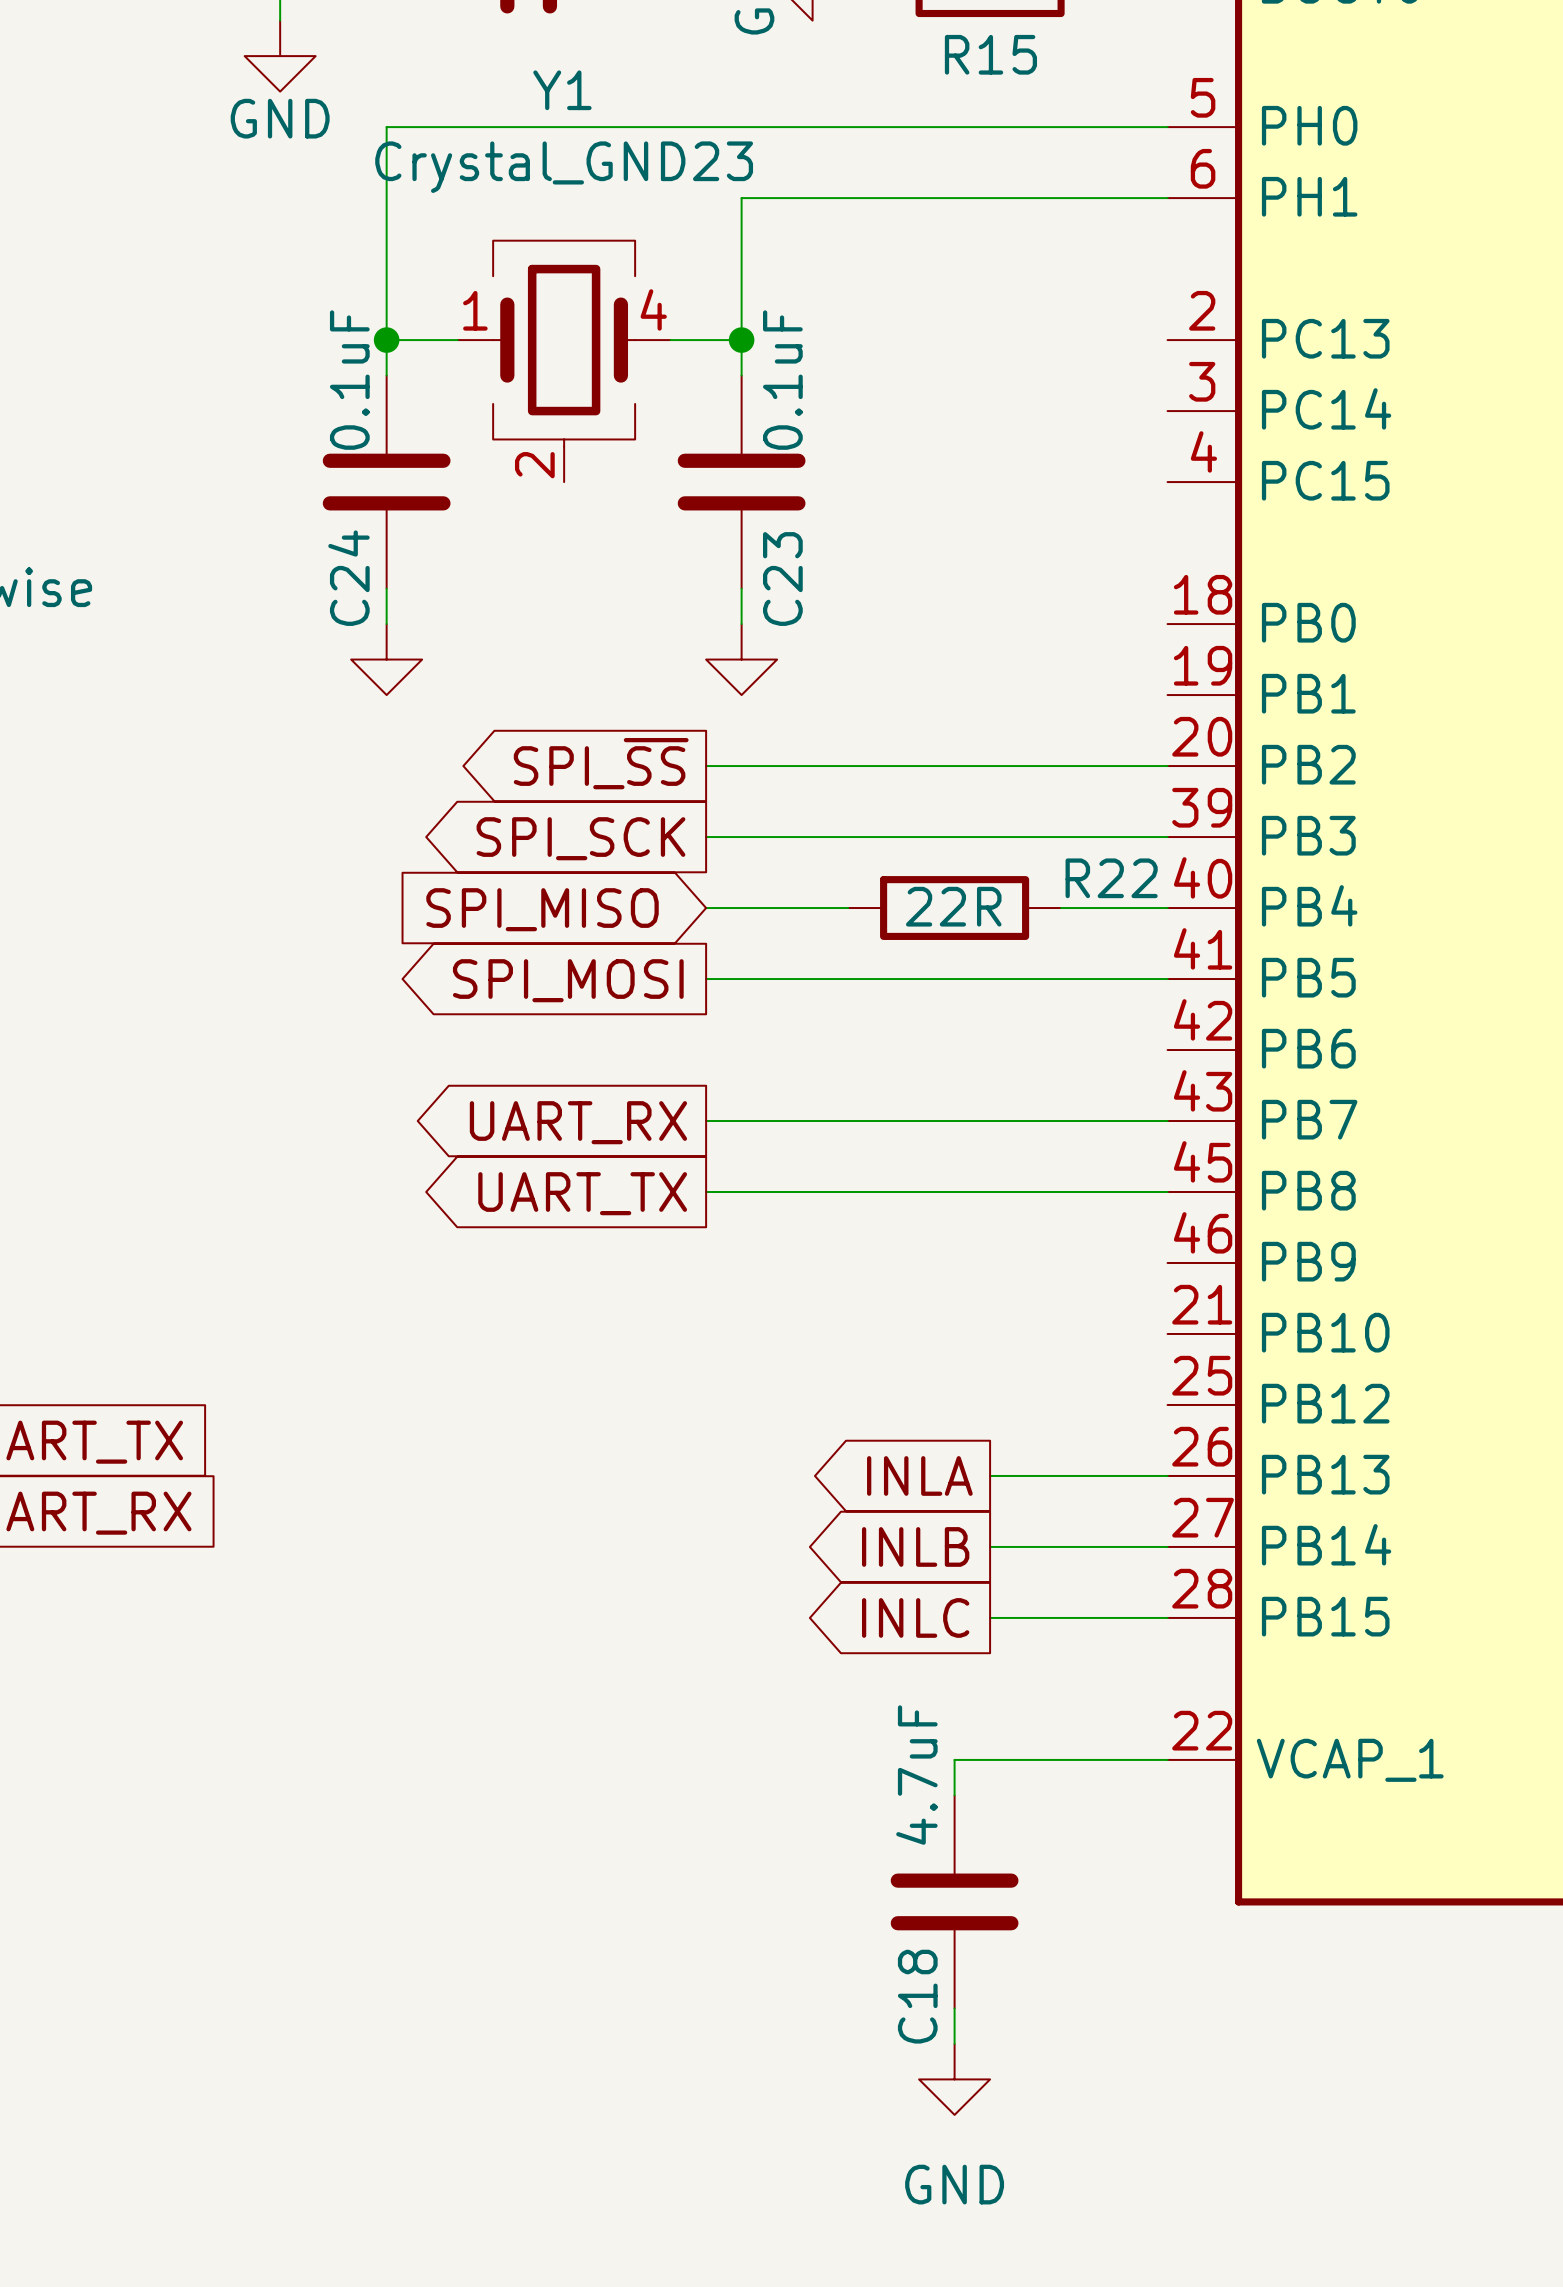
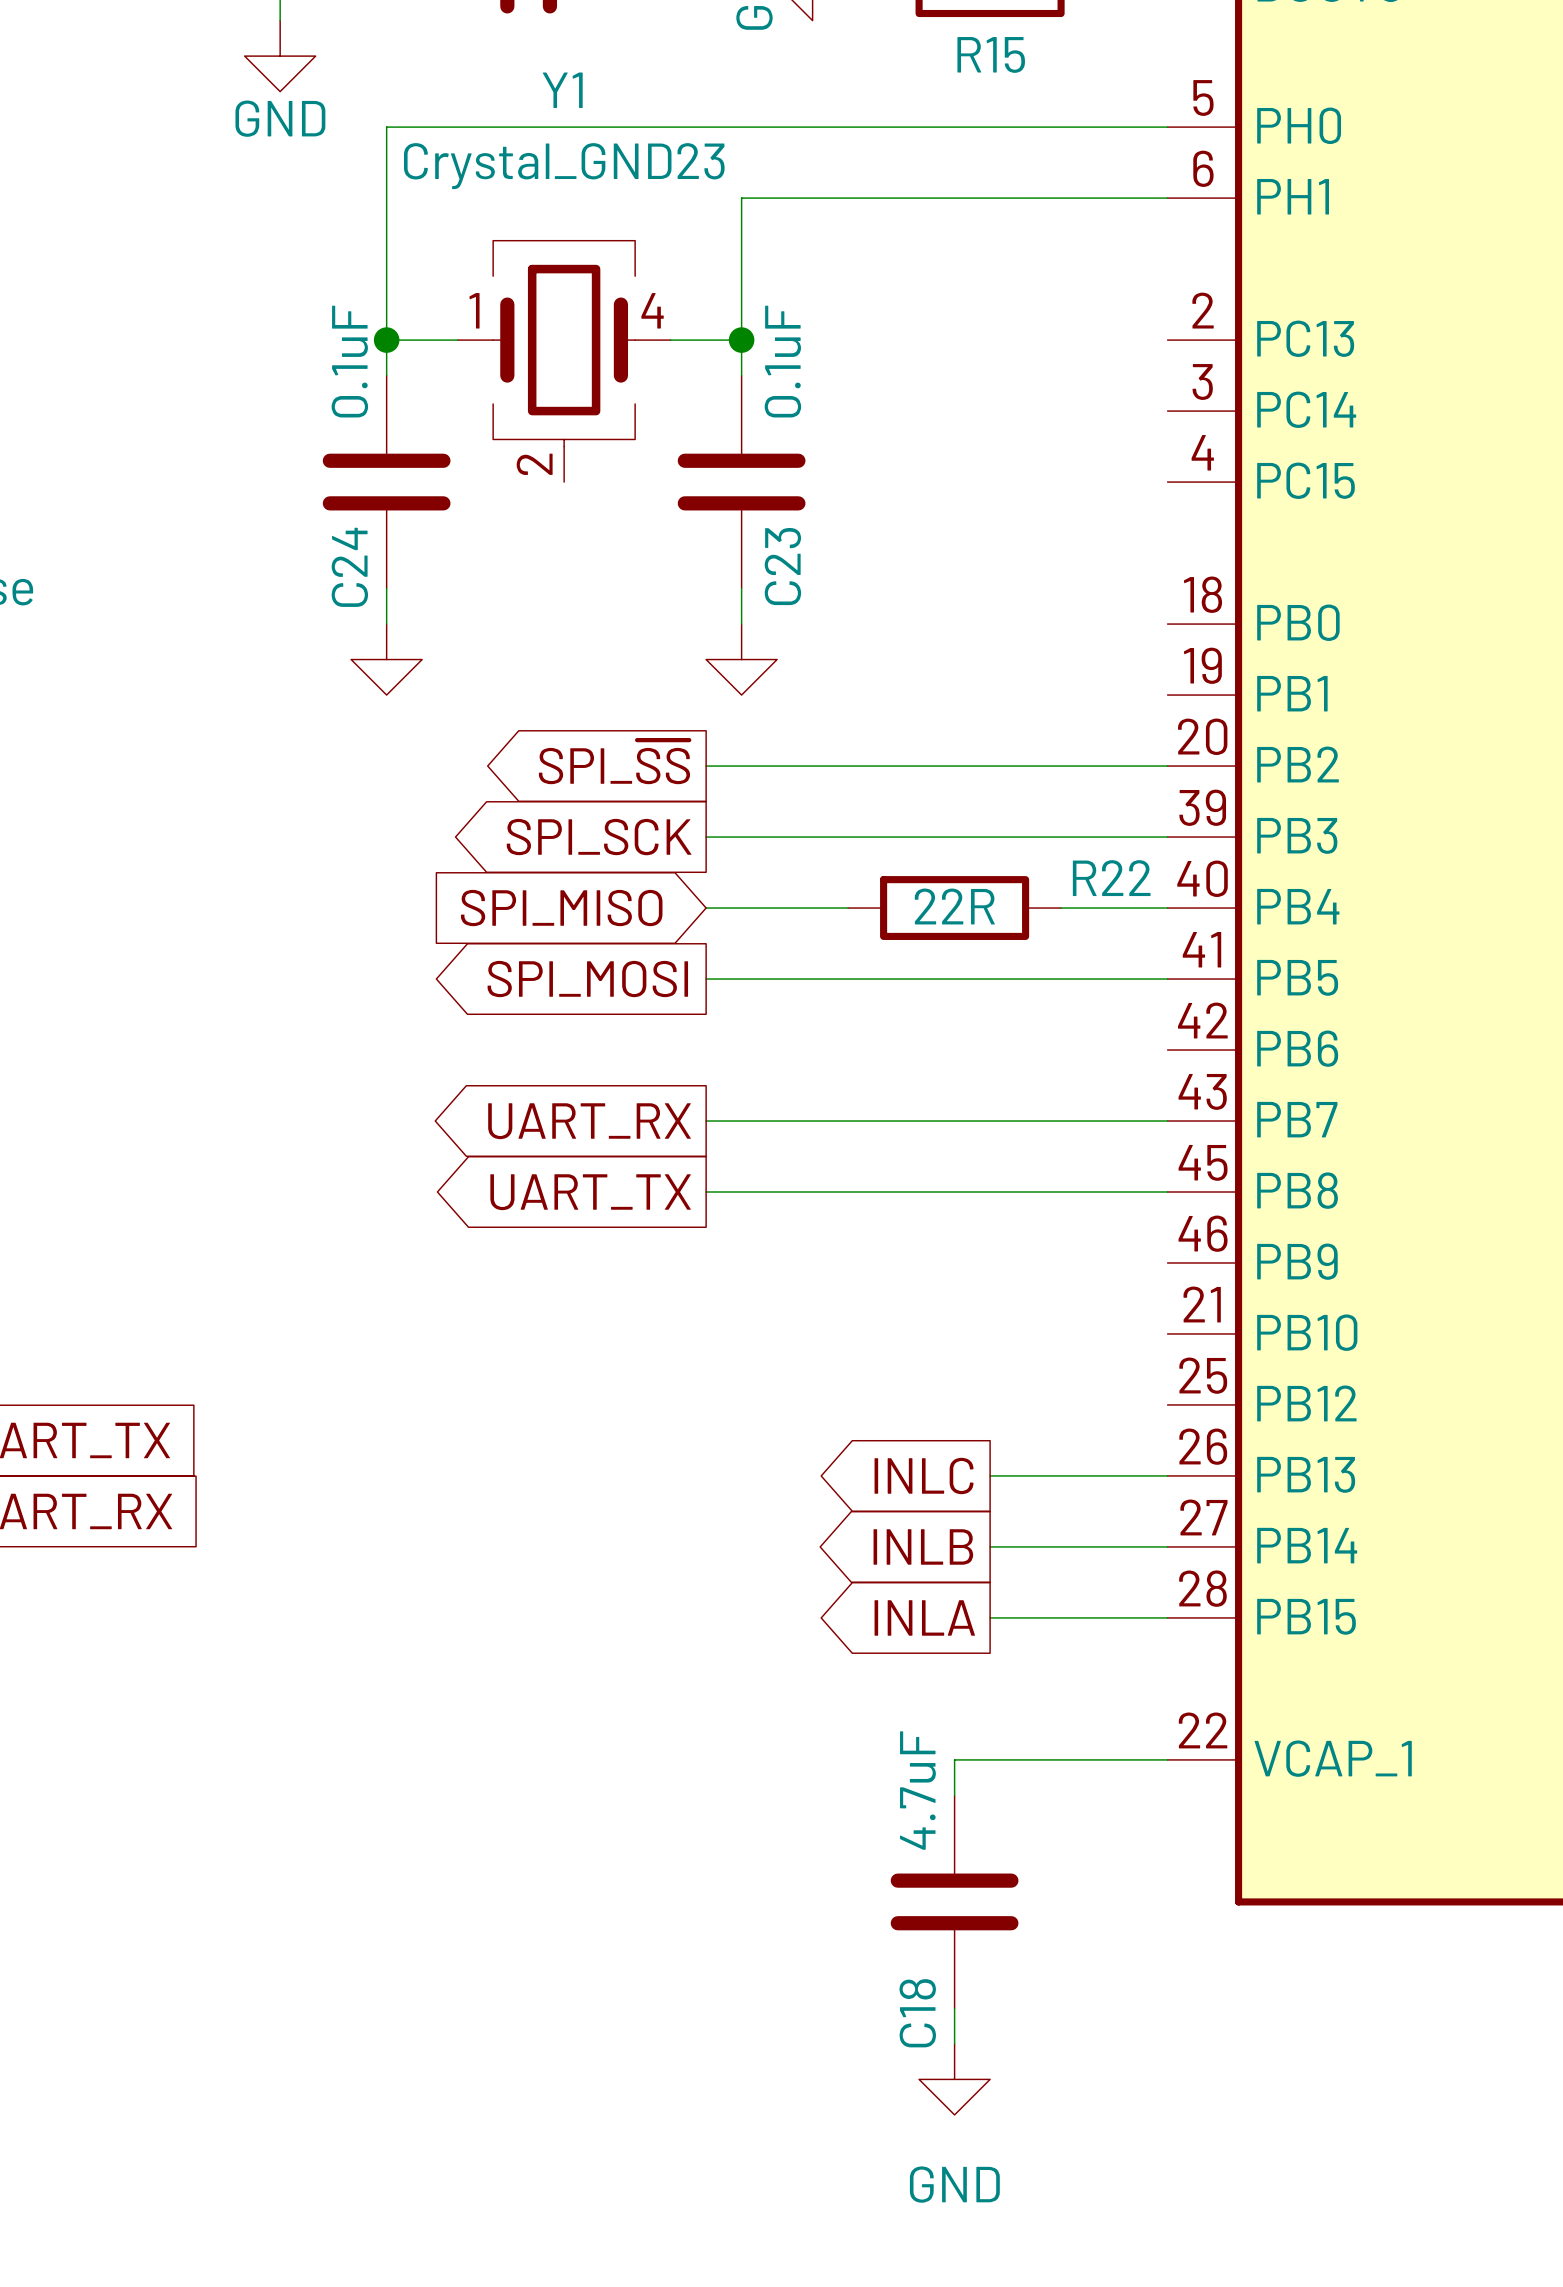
global label: INLA (919, 1475) -> INLC (924, 1476)
global label: INLC (915, 1617) -> INLA (924, 1617)

